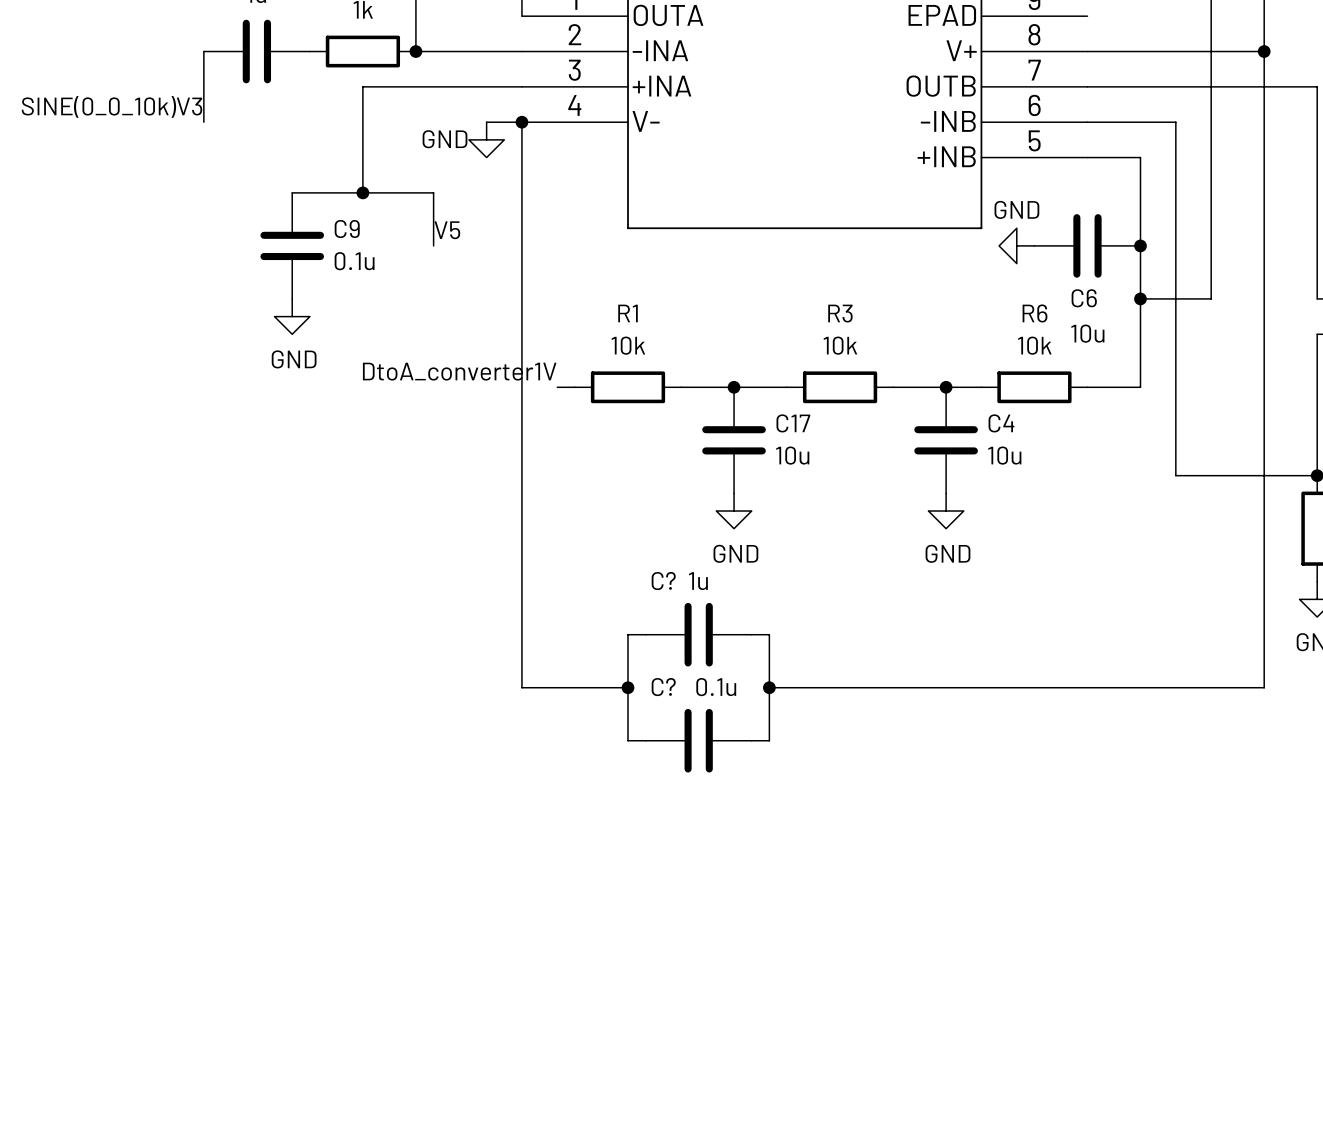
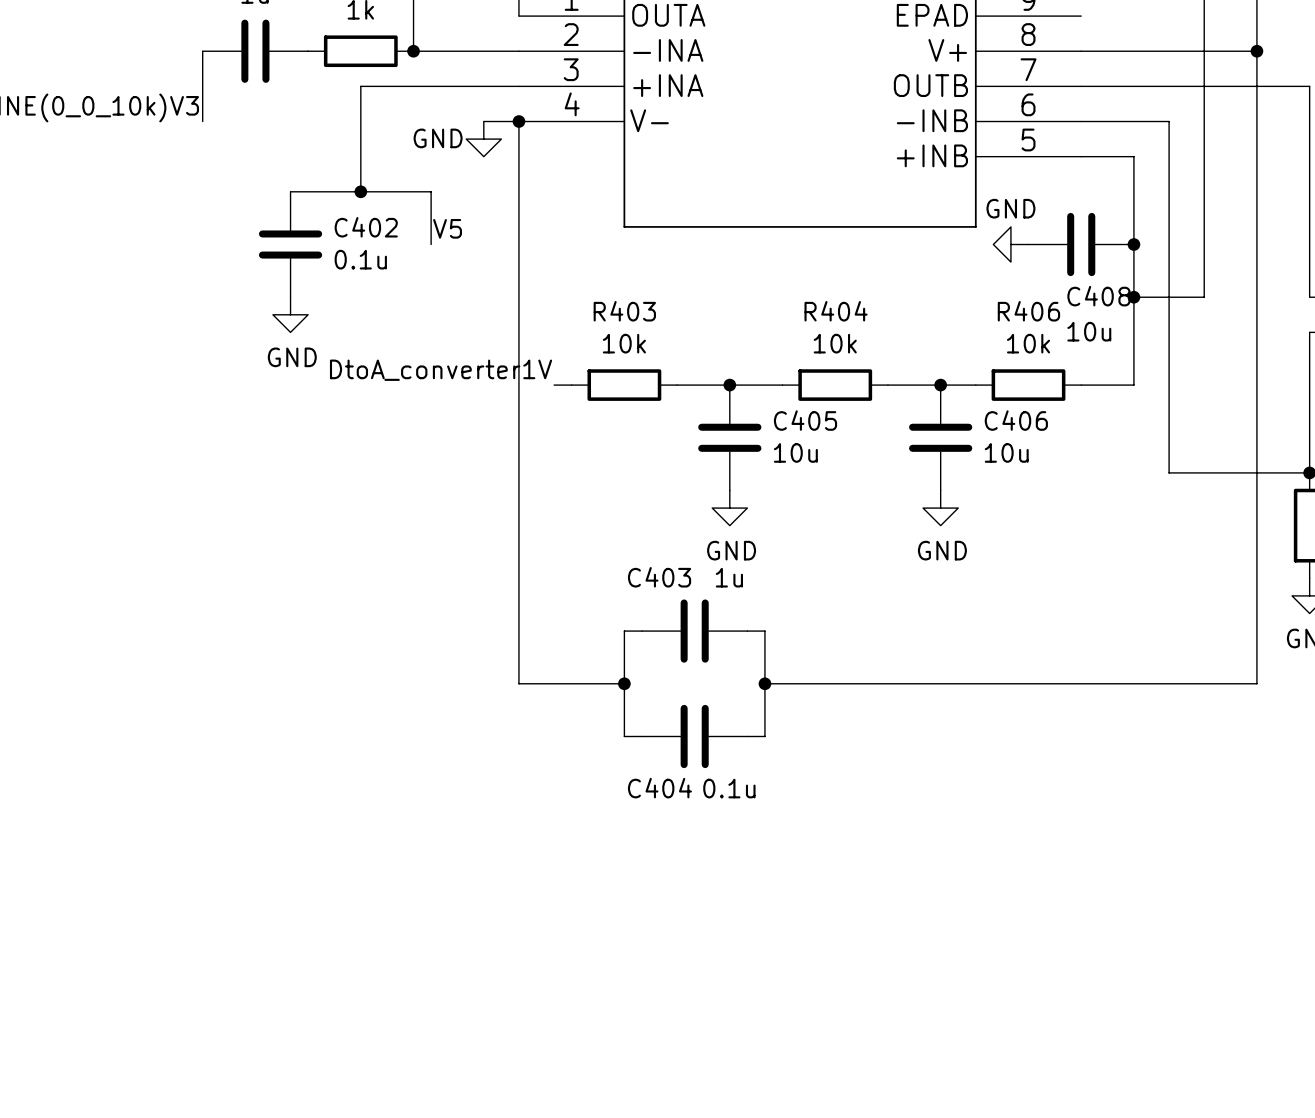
C9 name: C9 (347, 229) -> C402 (366, 227)
C6 name: C6 (1084, 298) -> C408 (1098, 296)
R1 name: R1 (628, 313) -> R403 (624, 311)
R3 name: R3 (840, 313) -> R404 (836, 311)
R6 name: R6 (1035, 313) -> R406 (1028, 311)
C17 name: C17 (793, 423) -> C405 (805, 420)
C4 name: C4 (1001, 423) -> C406 (1016, 420)
C? name: C? (663, 581) -> C403 (659, 577)
C? value position: 1u (698, 581) -> 1u (729, 577)
C? name: C? (663, 687) -> C404 (659, 788)
C? value position: 0.1u (716, 687) -> 0.1u (729, 788)

